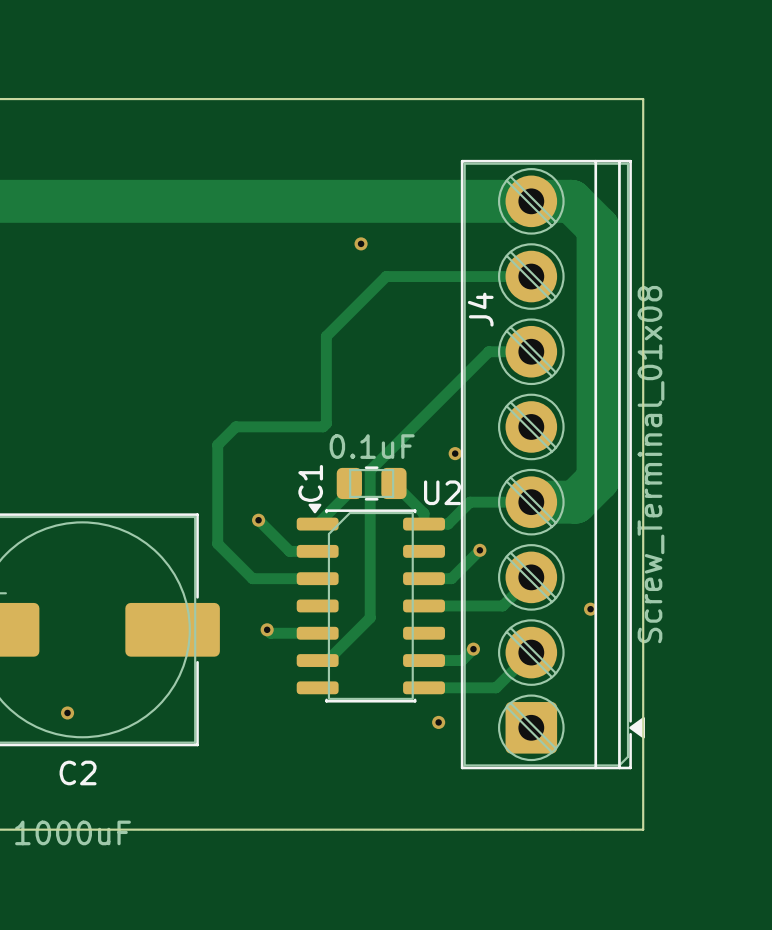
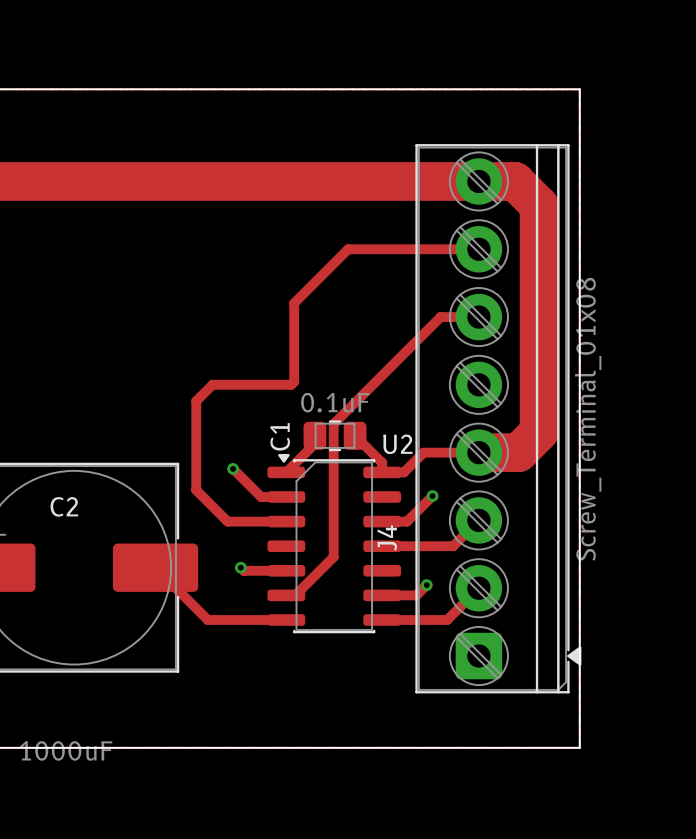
via: (361, 243) -> none
J4 name position: J4 (480, 309) -> J4 (387, 537)
via: (455, 453) -> none
via: (590, 609) -> none
track: none -> (155, 567) (207, 620) (286, 620)
via: (67, 712) -> none
via: (438, 722) -> none
C2 name position: C2 (78, 772) -> C2 (64, 506)

